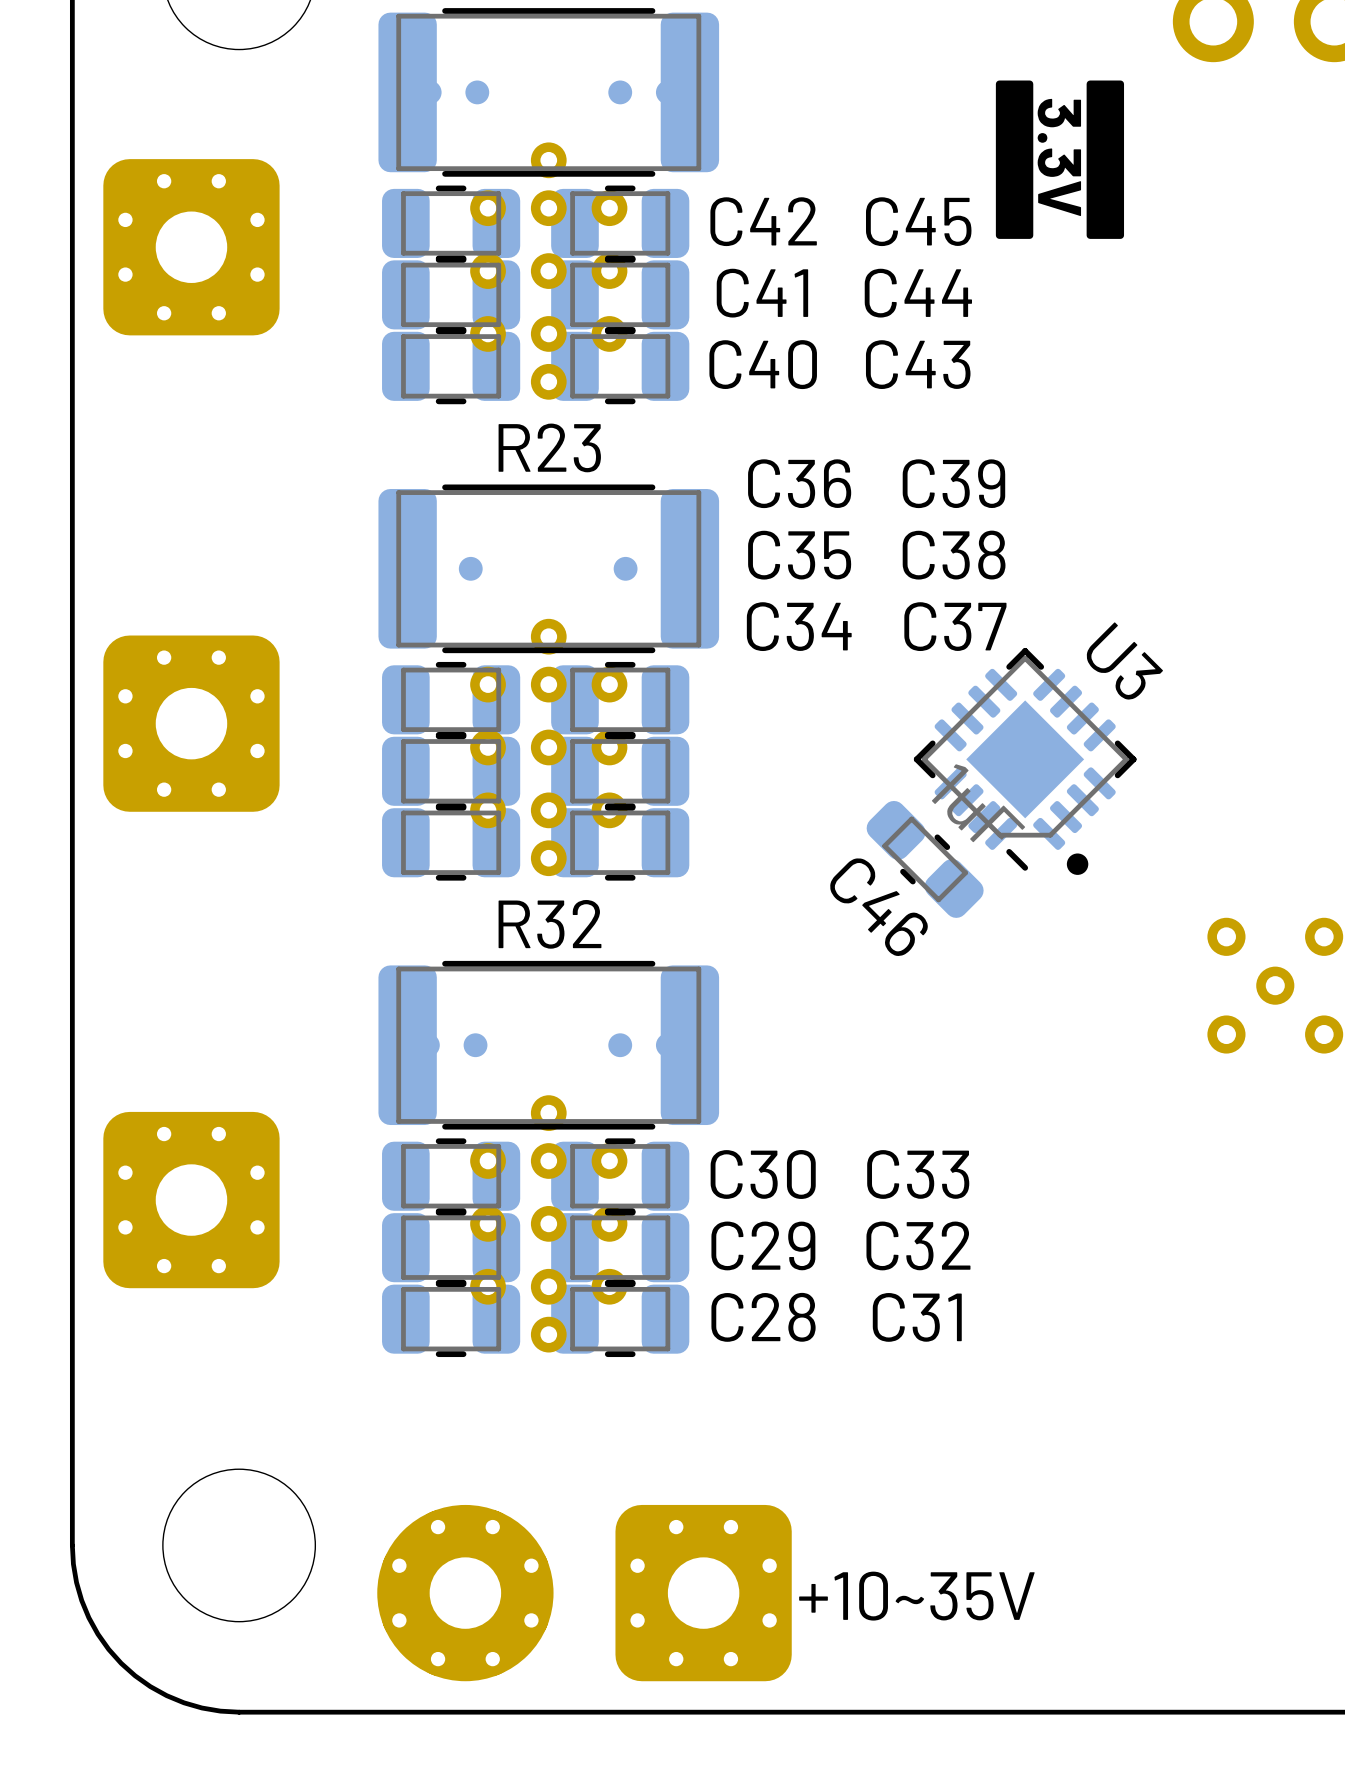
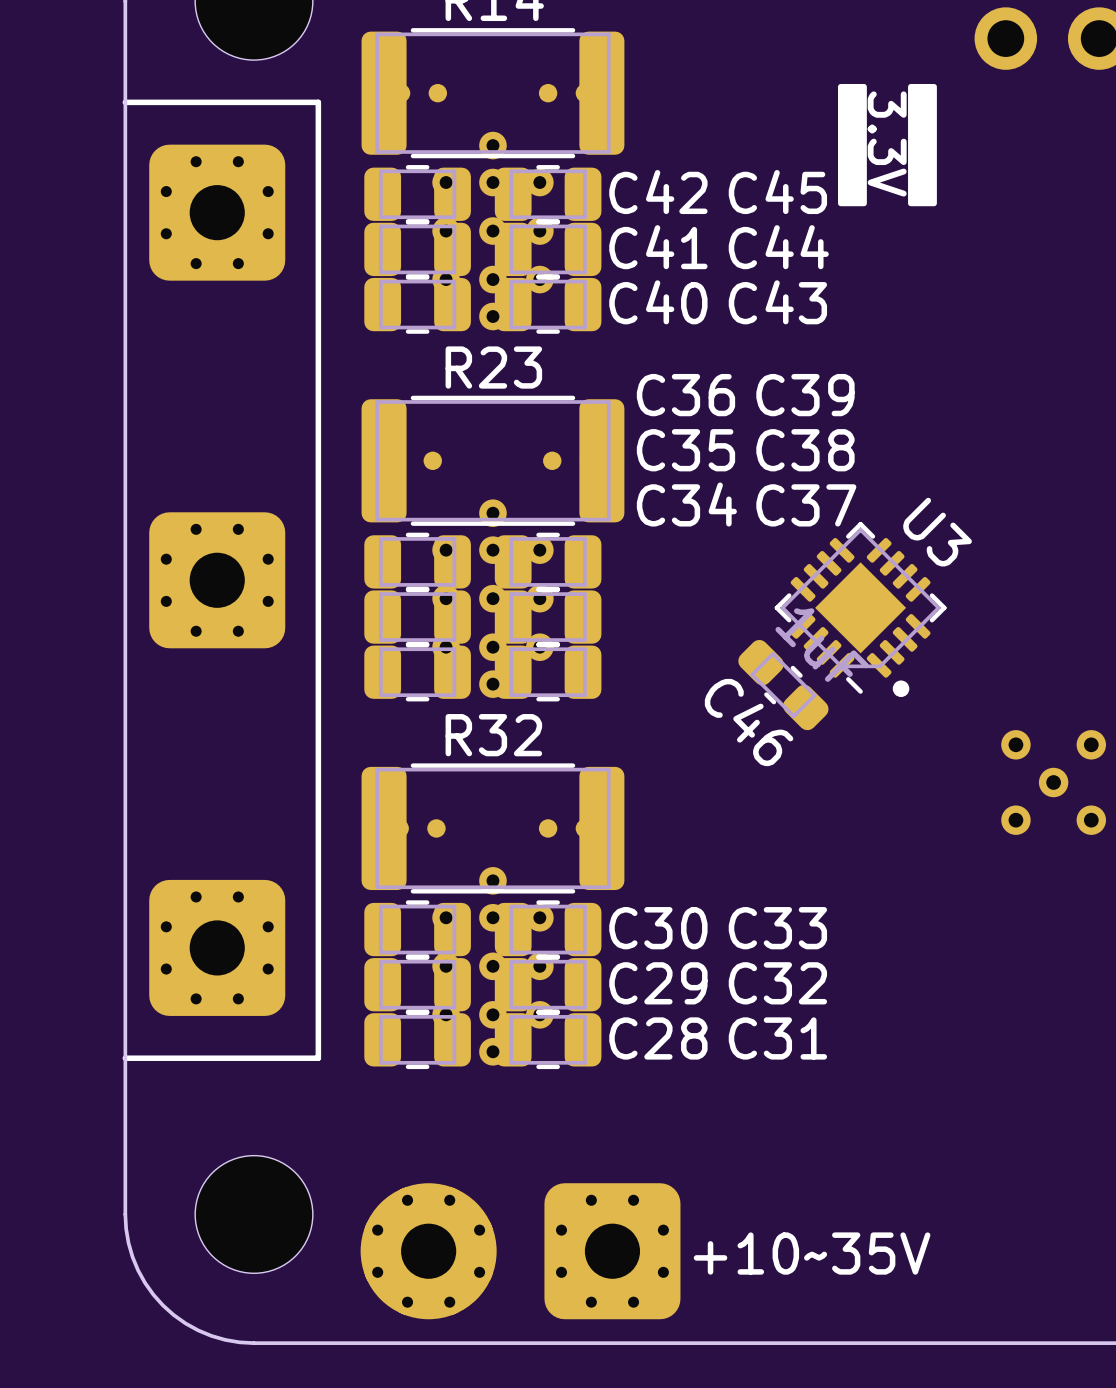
line: none -> (125, 102) (318, 102) (318, 1058) (125, 1058)

